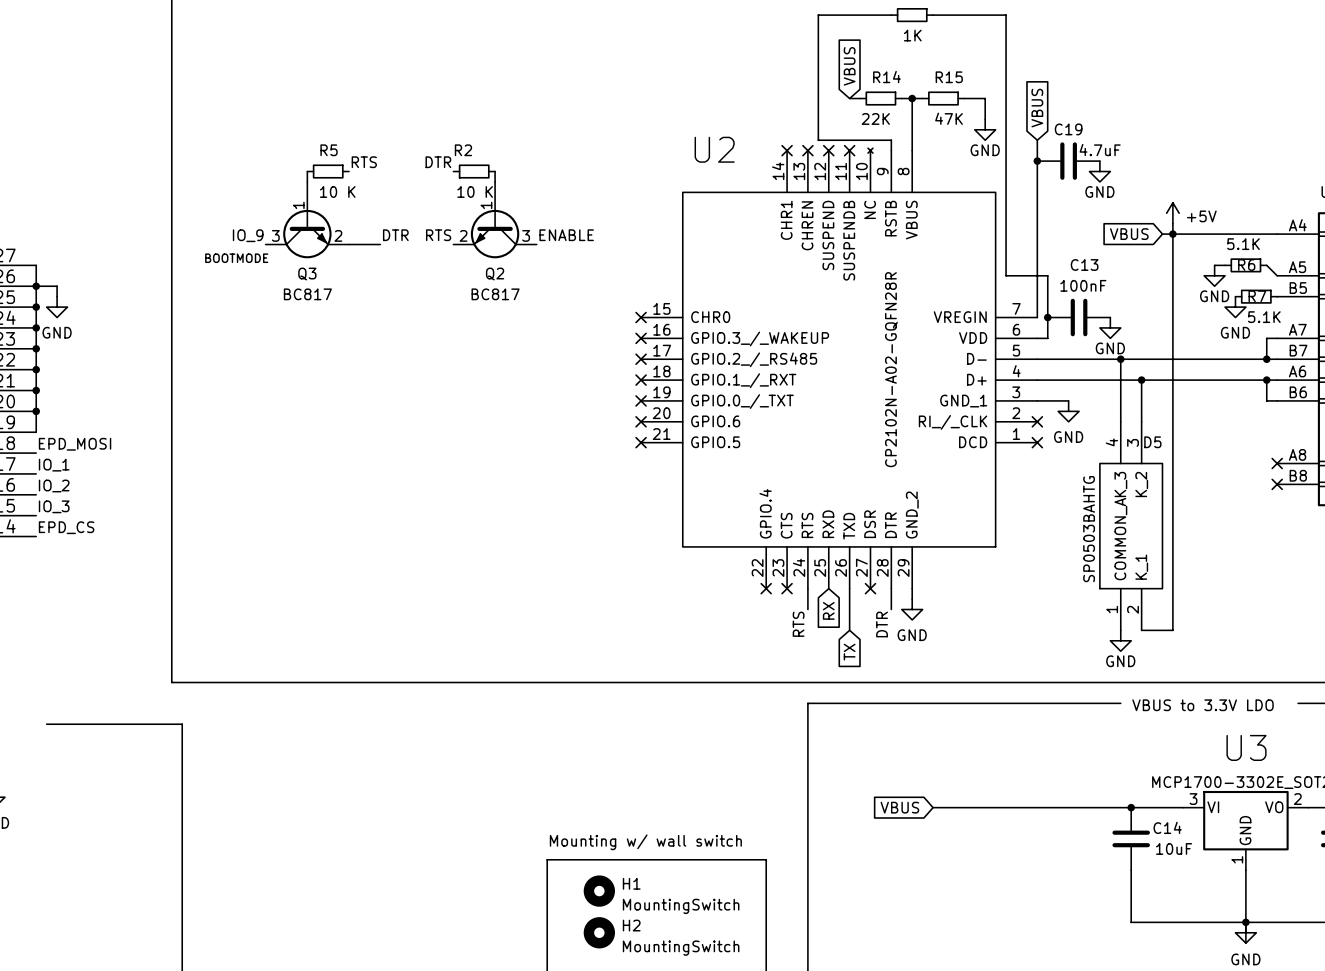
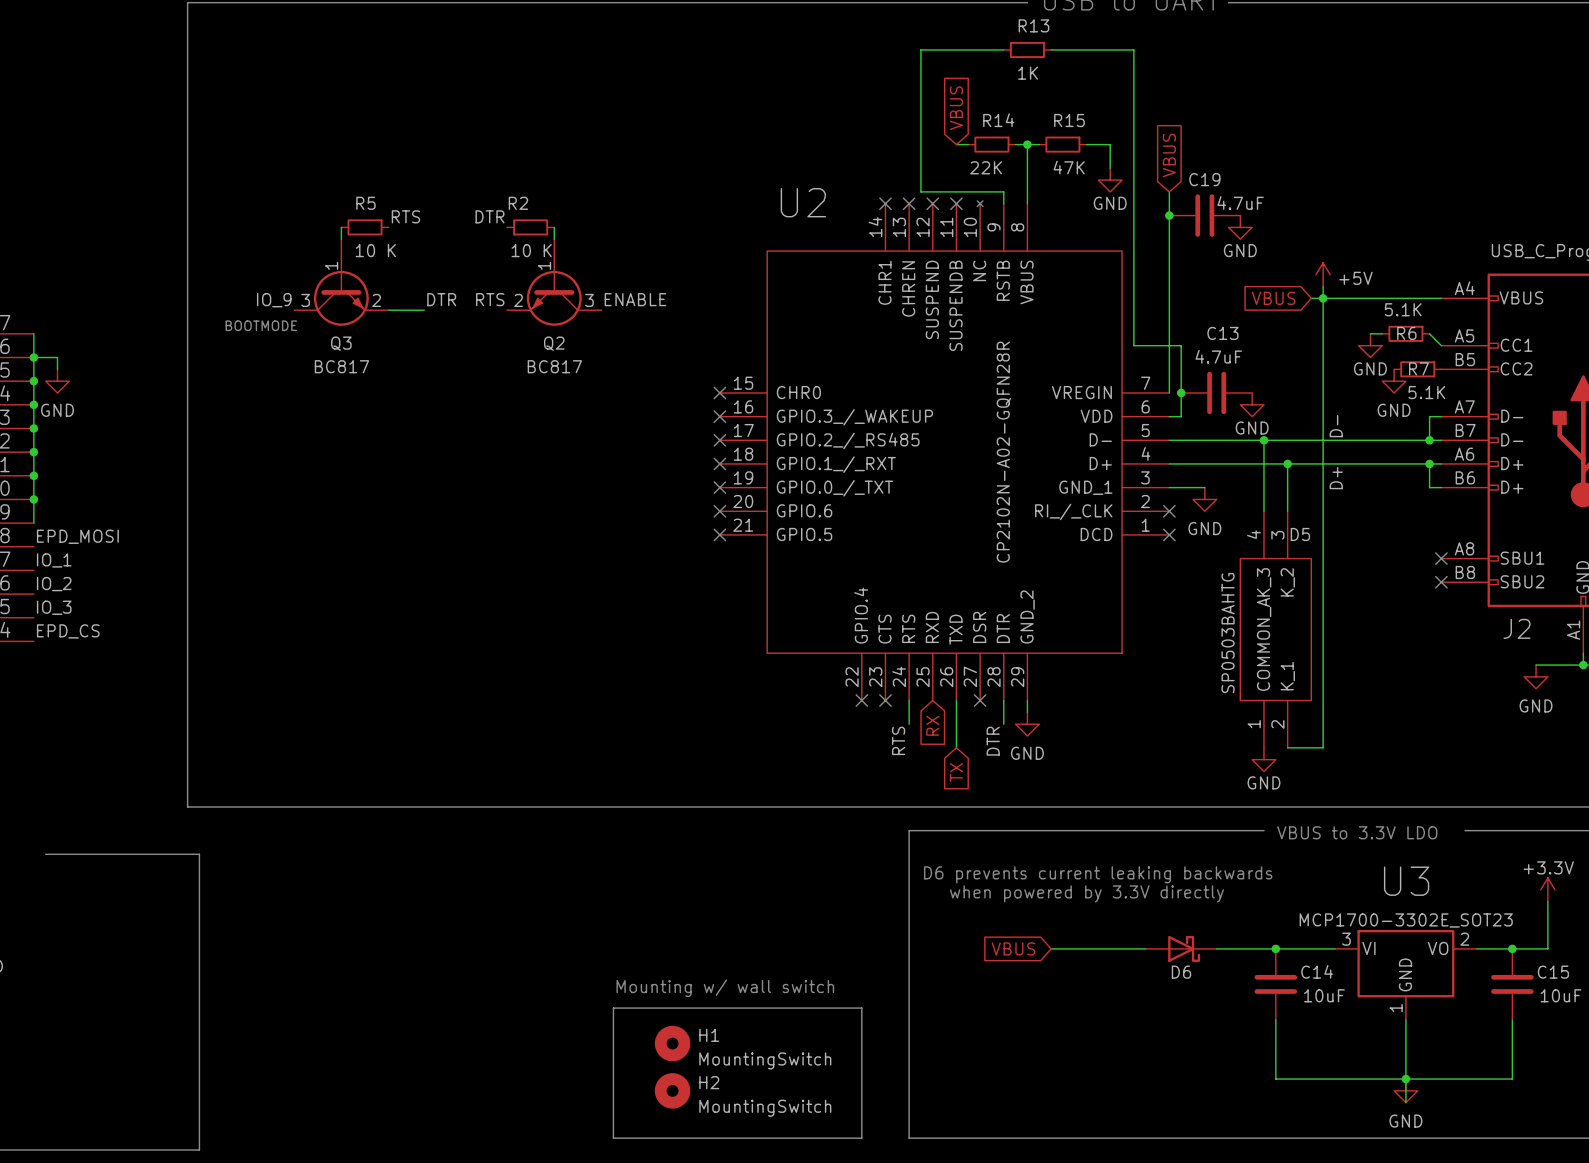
C13 value: 100nF (1083, 285) -> 4.7uF (1218, 356)
label: none -> D- (1336, 426)
label: none -> D+ (1336, 478)
text: none -> D6 prevents current leaking backwards (1098, 874)
text: none -> when powered by 3.3V directly (1086, 893)
D6: none -> (1181, 948)

